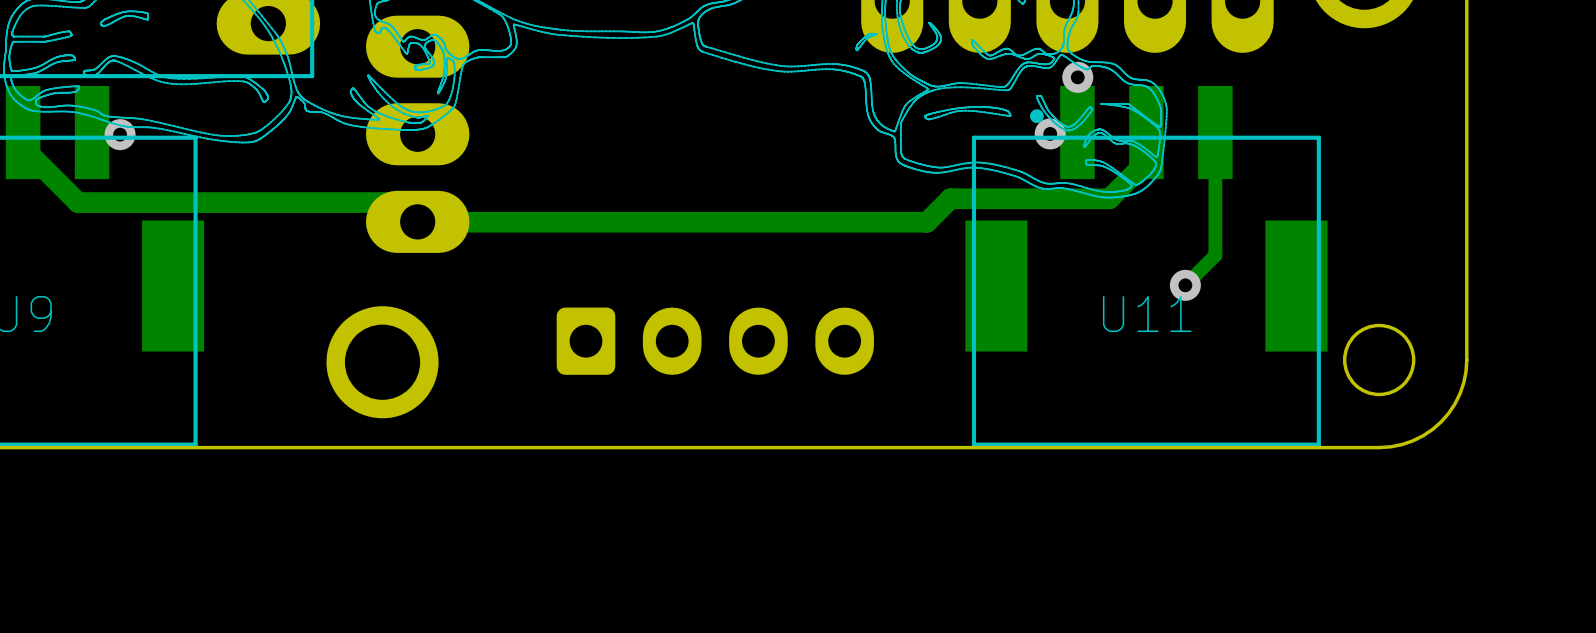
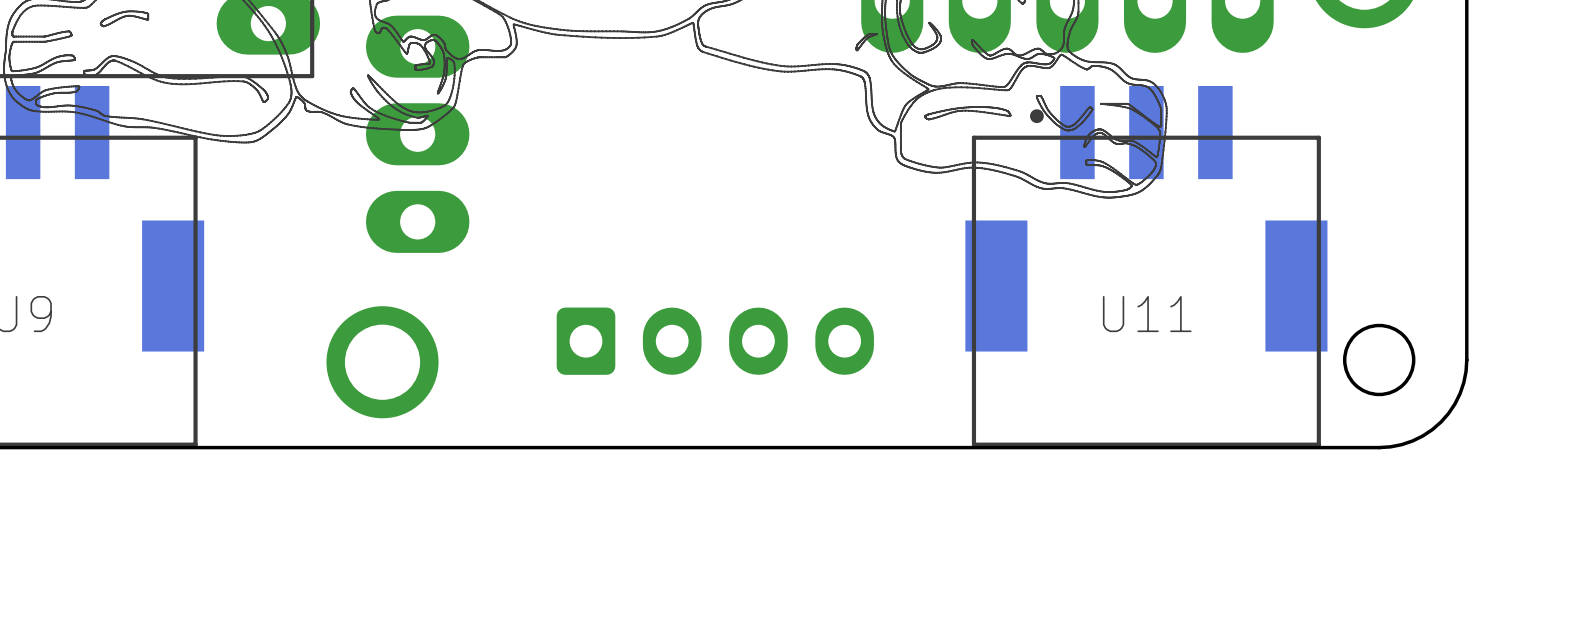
via: (1077, 77) -> none
track: (1215, 132) (1215, 255) (1185, 285) -> none
via: (1050, 133) -> none
via: (120, 134) -> none
track: (23, 147) (77, 202) (398, 202) -> none
track: (1146, 161) (1109, 198) (950, 198) (927, 222) (418, 222) (394, 199) -> none
via: (1185, 285) -> none

